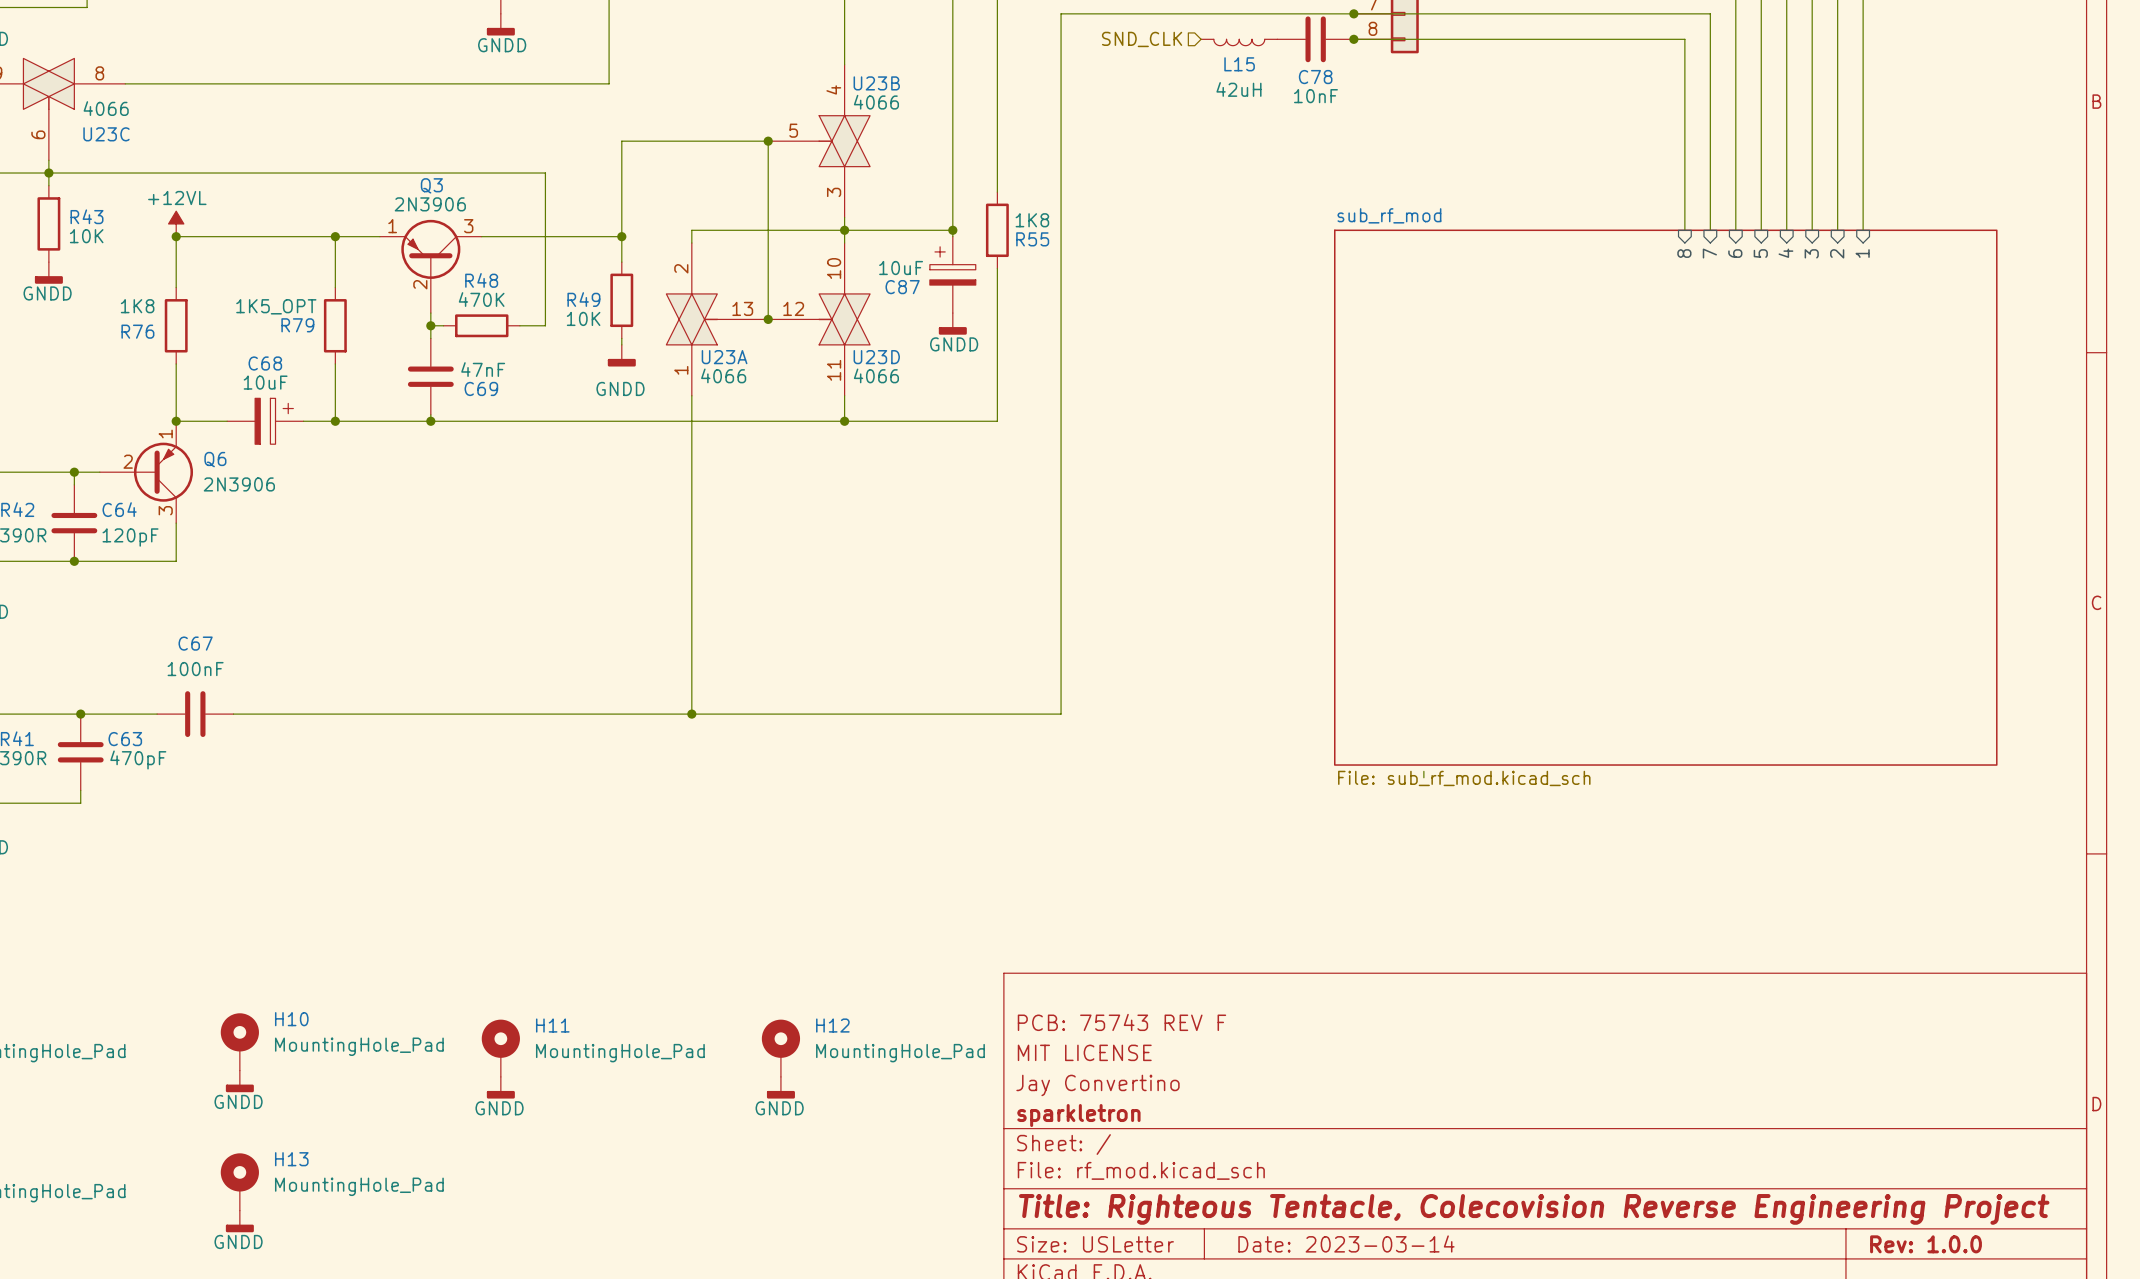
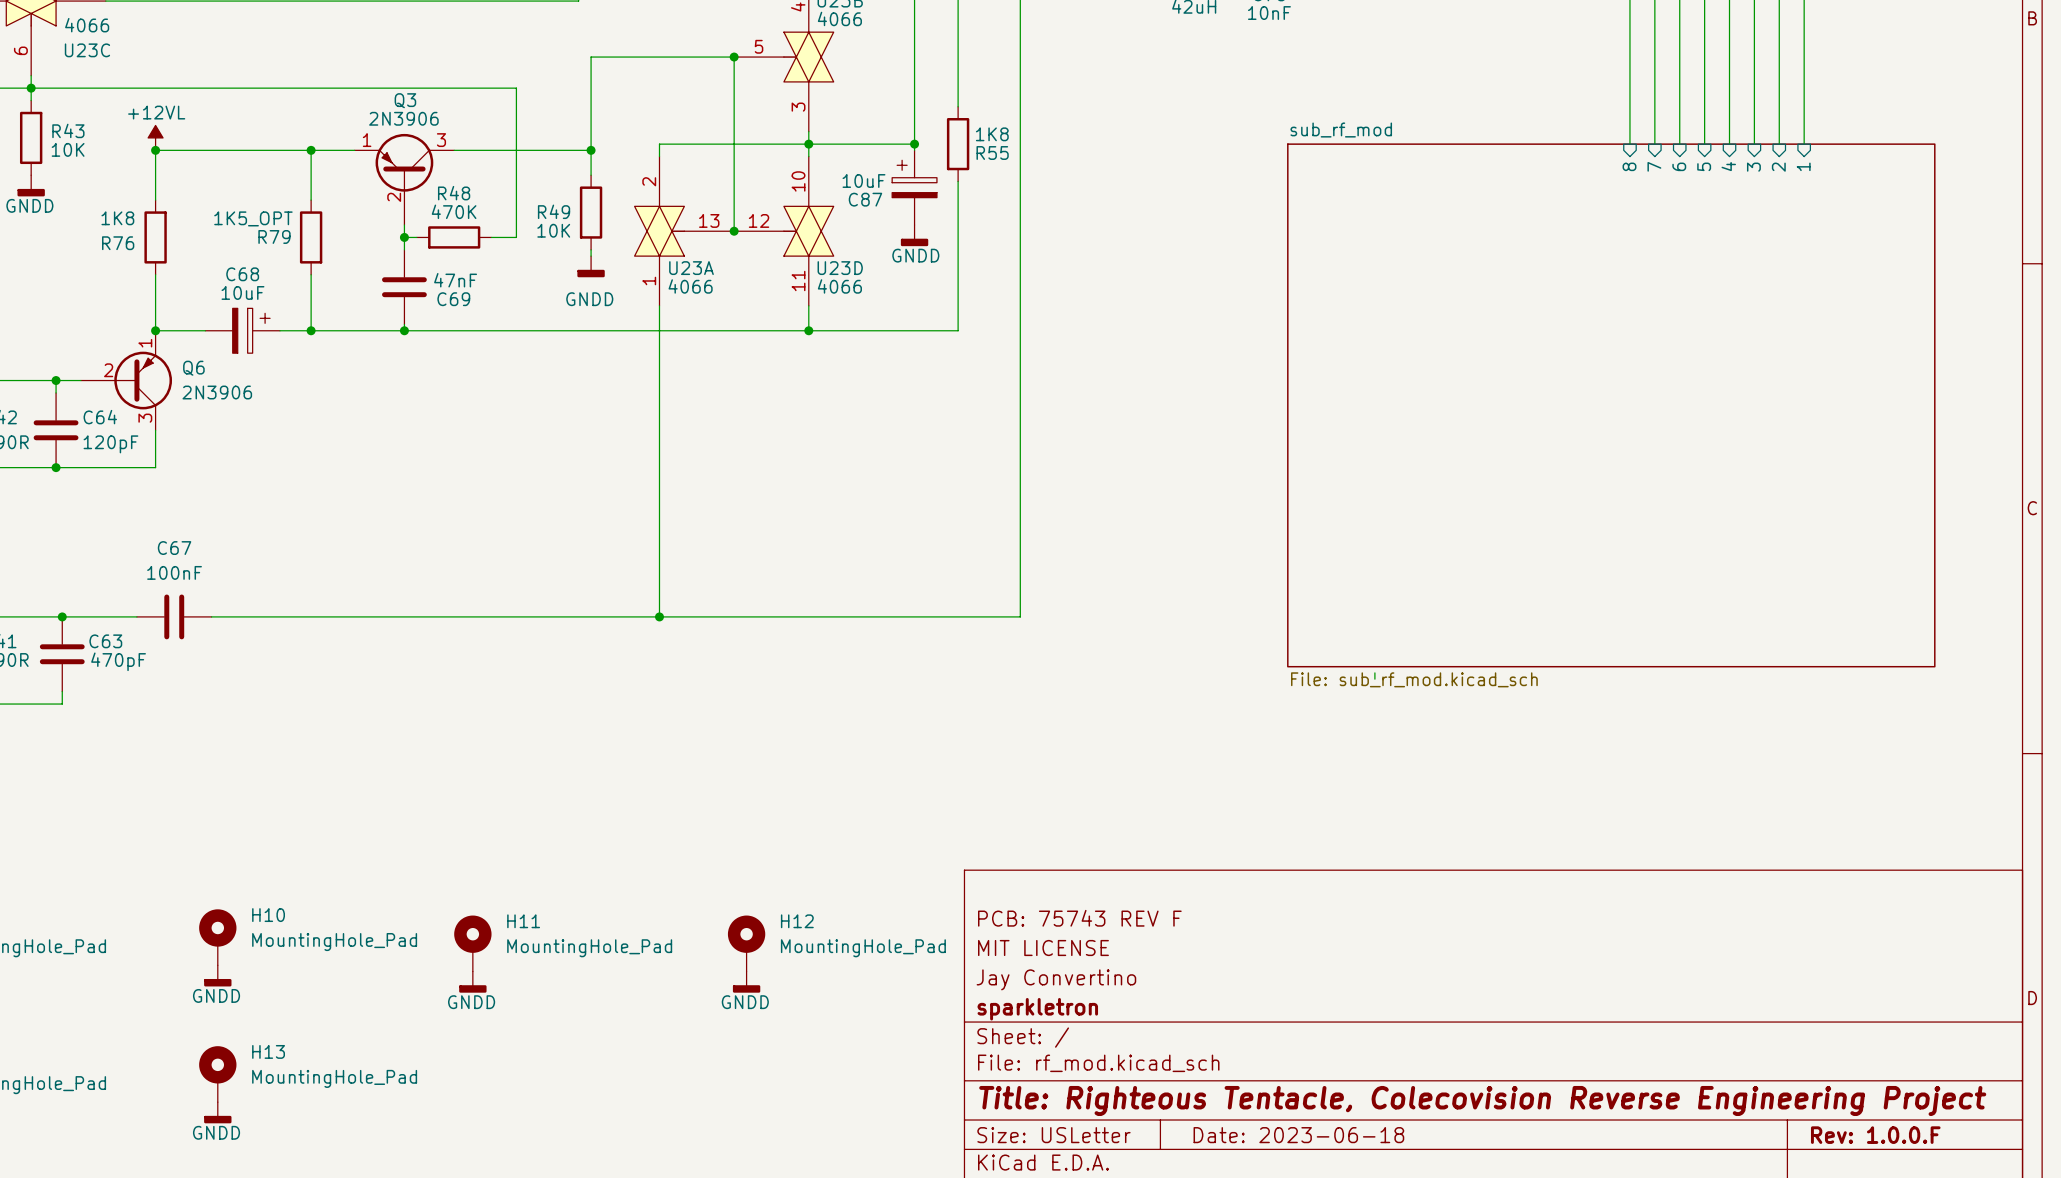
title block: Date: 2023-03-14 (1346, 1243) -> Date: 2023-06-18 (1298, 1135)
title block: Rev: 1.0.0 (1926, 1244) -> Rev: 1.0.0.F (1875, 1135)

